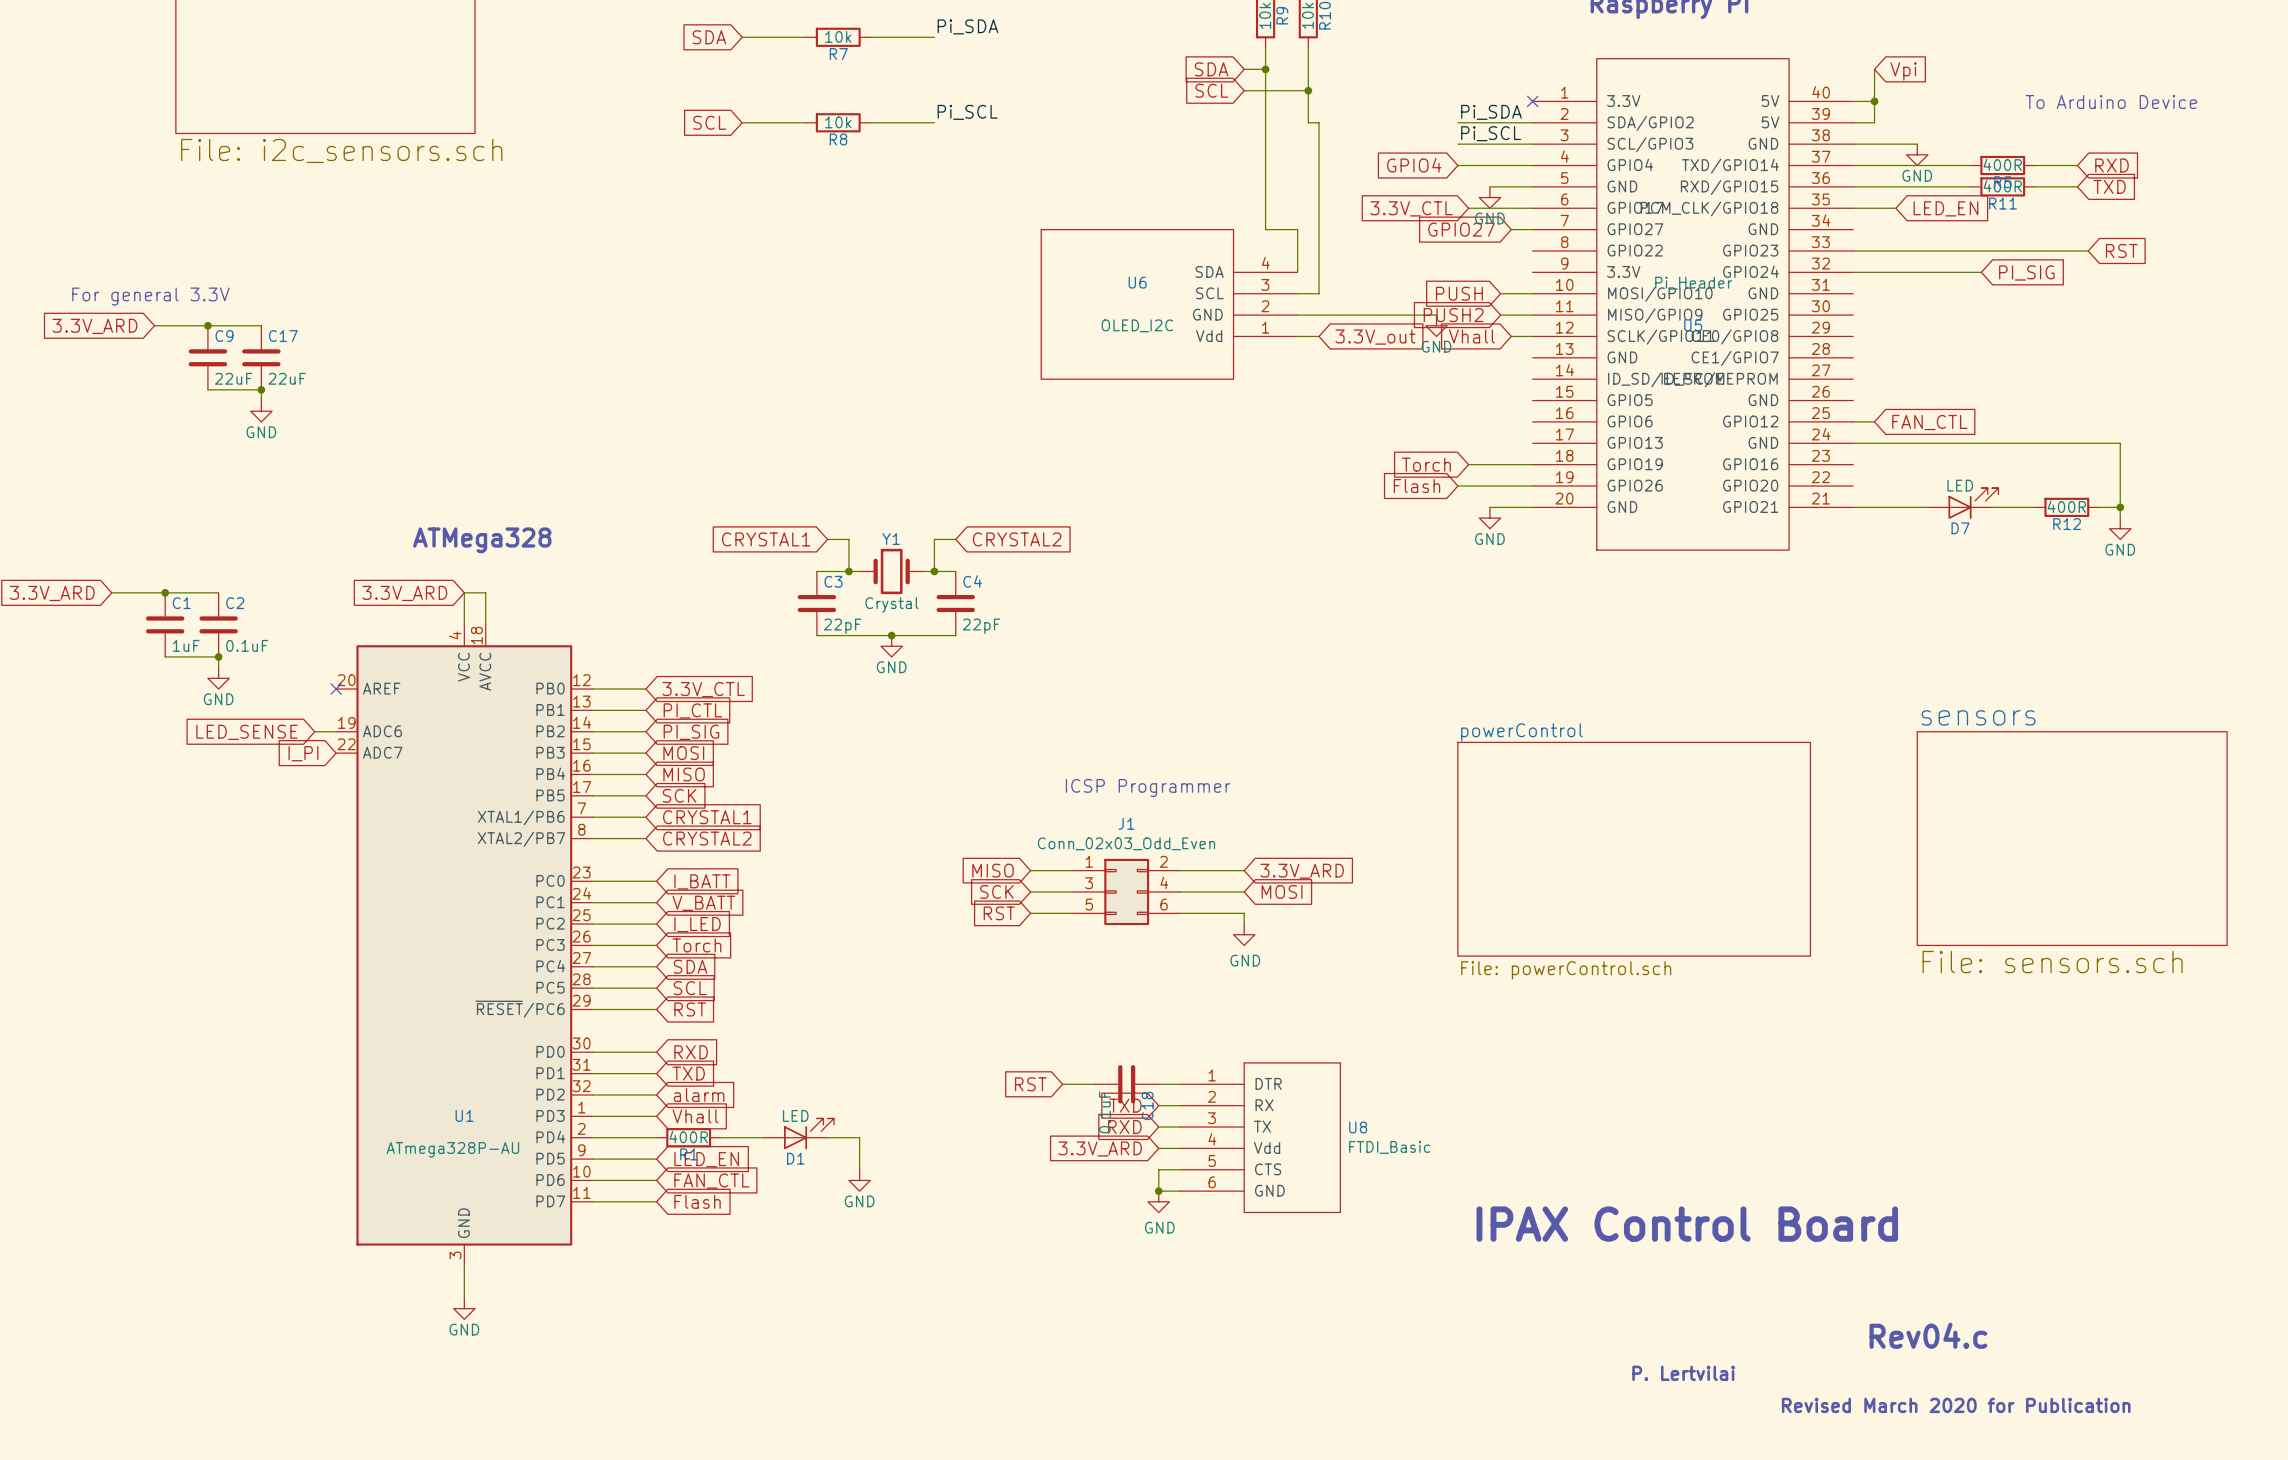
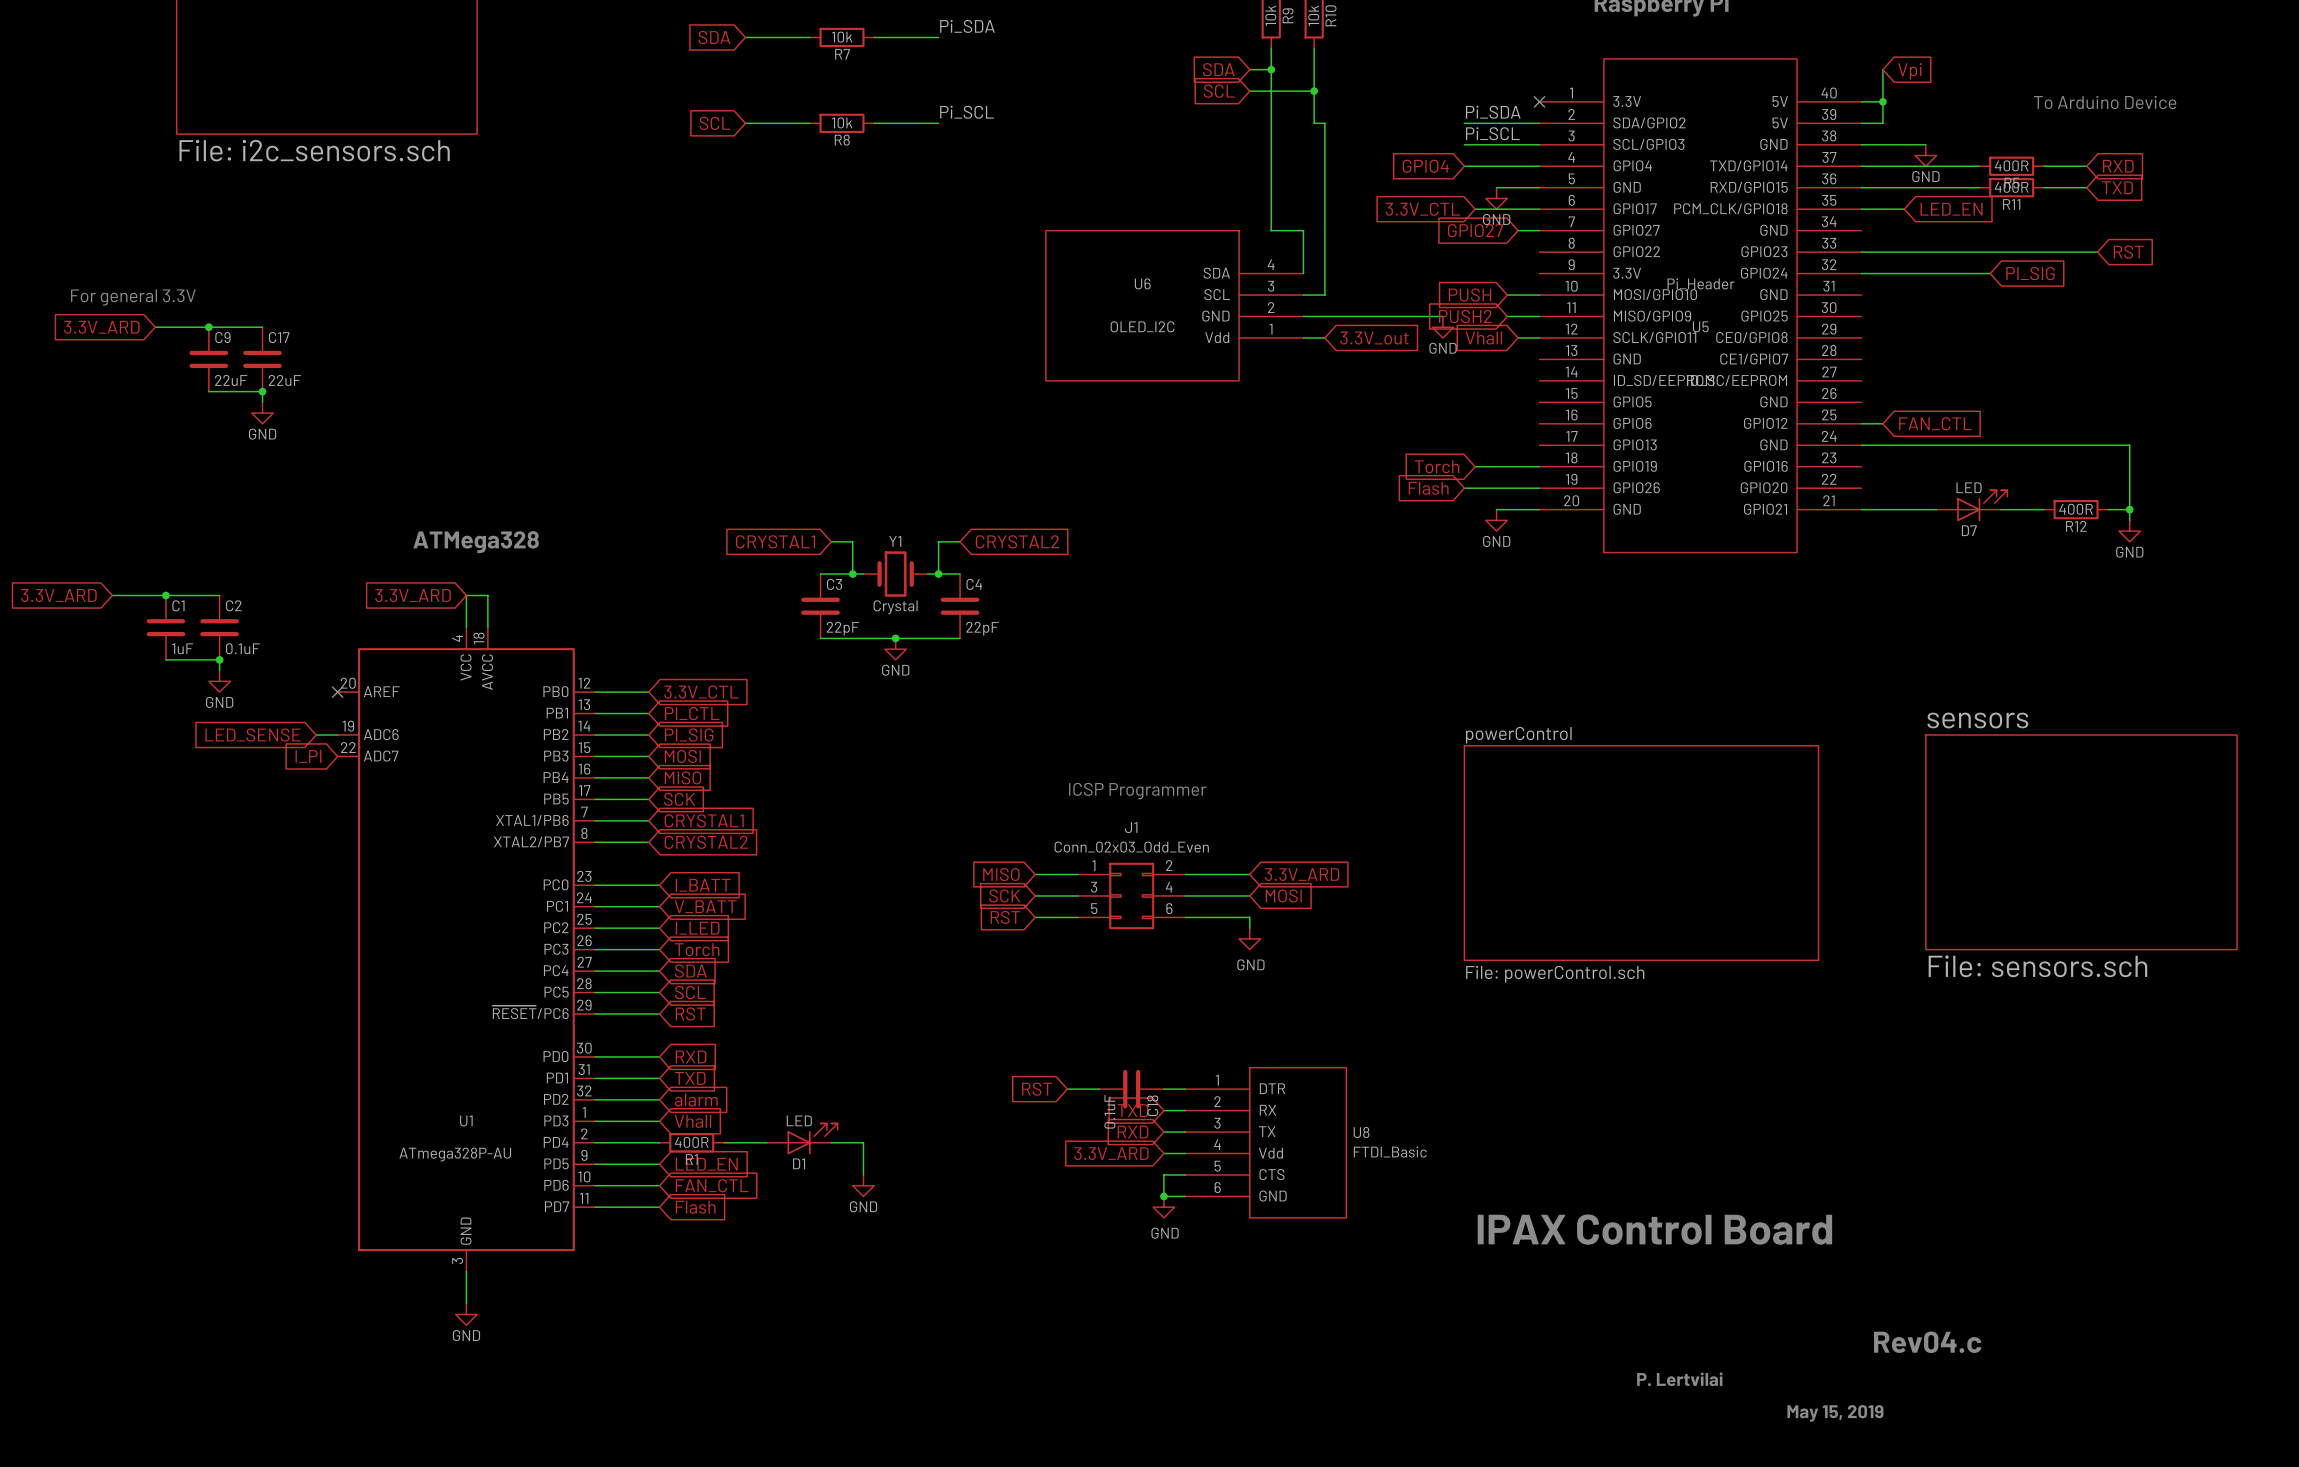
text: Revised March 2020 for Publication (1956, 1405) -> May 15, 2019 (1835, 1413)

